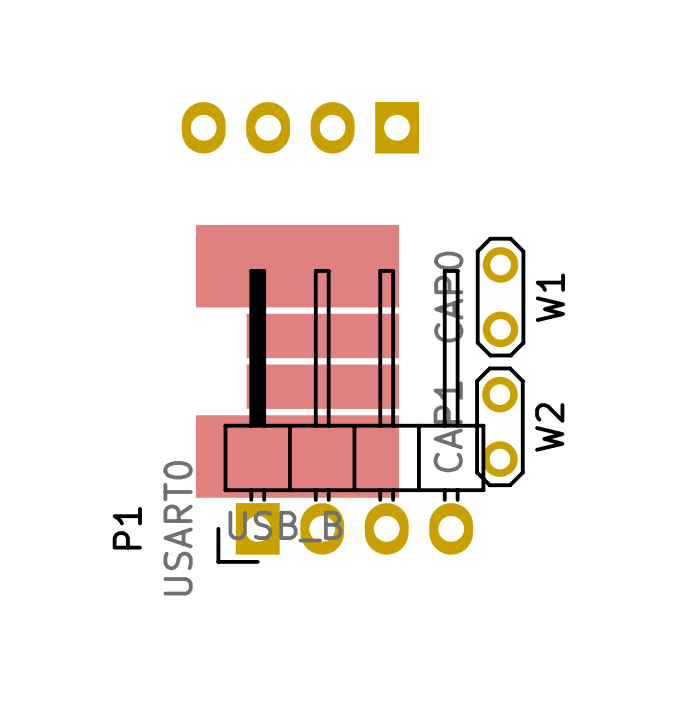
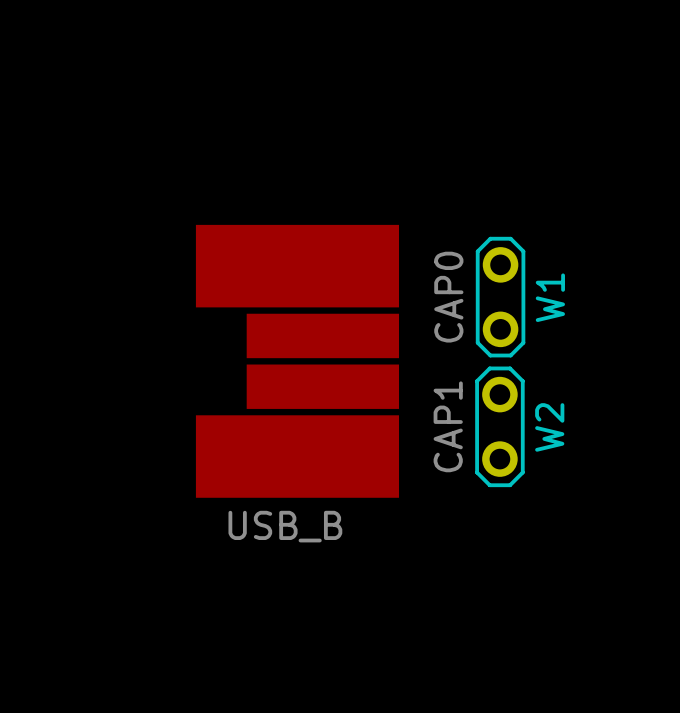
part: (300, 127) -> none
P1: USART0 (350, 416) -> none

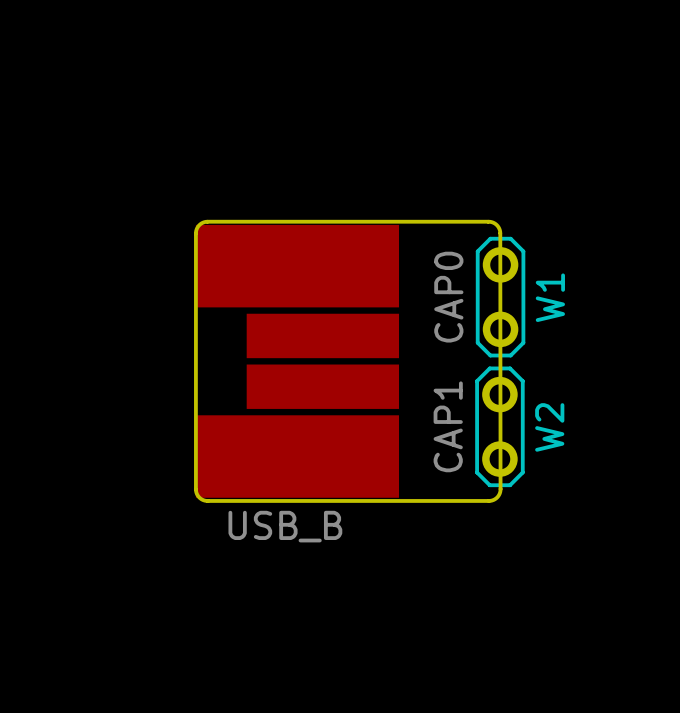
board edge: none -> (207, 221) (199, 225) (195, 233)
board edge: none -> (207, 221) (488, 221)
board edge: none -> (488, 221) (496, 224) (500, 233)
board edge: none -> (195, 233) (195, 489)
board edge: none -> (500, 233) (500, 489) (497, 497) (489, 500)
board edge: none -> (195, 489) (199, 497) (207, 500)
board edge: none -> (207, 500) (488, 500)

